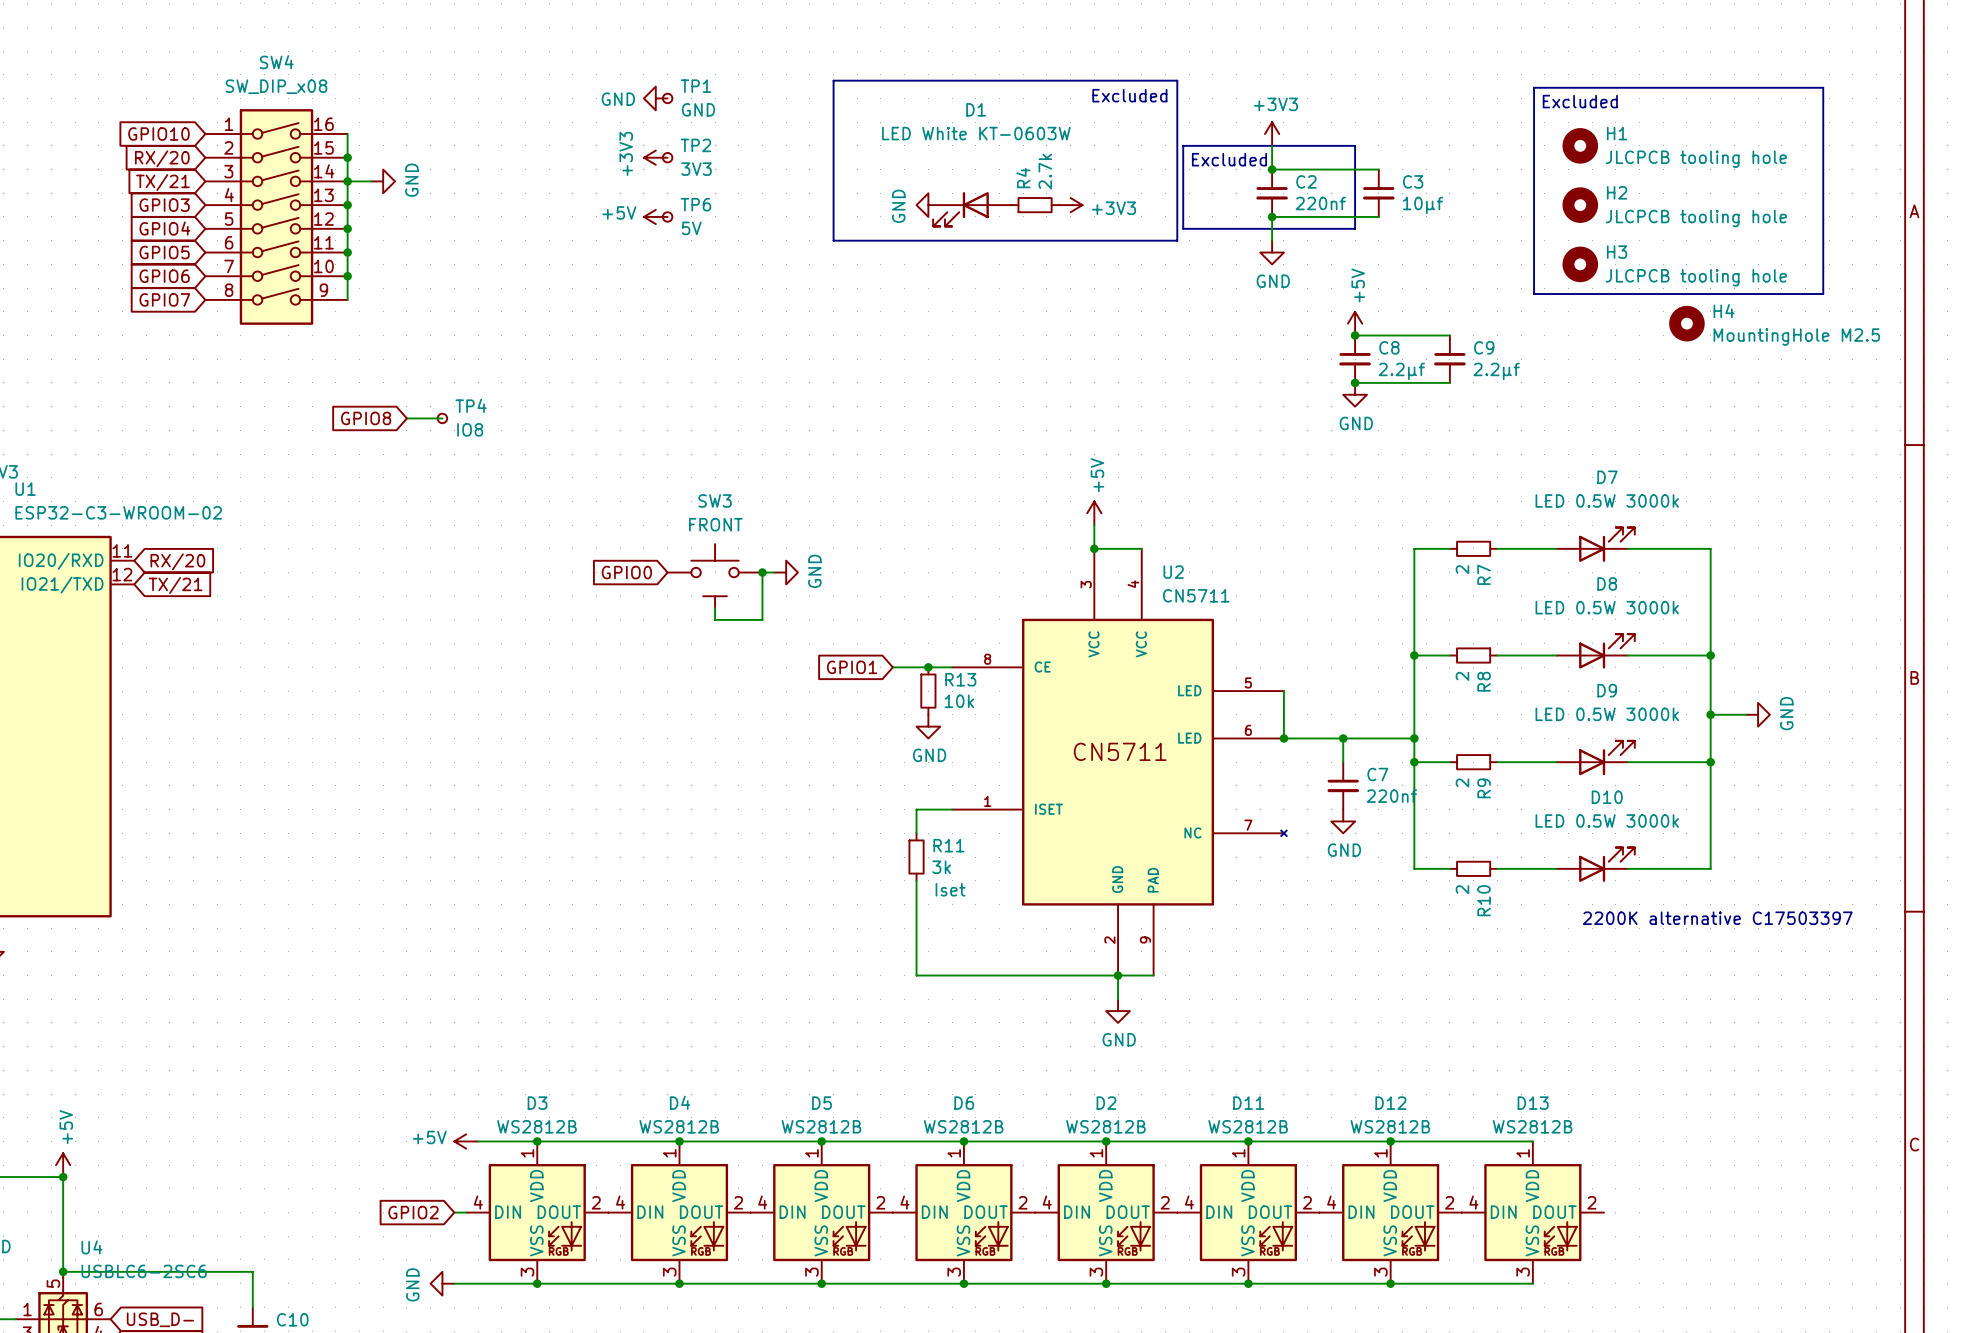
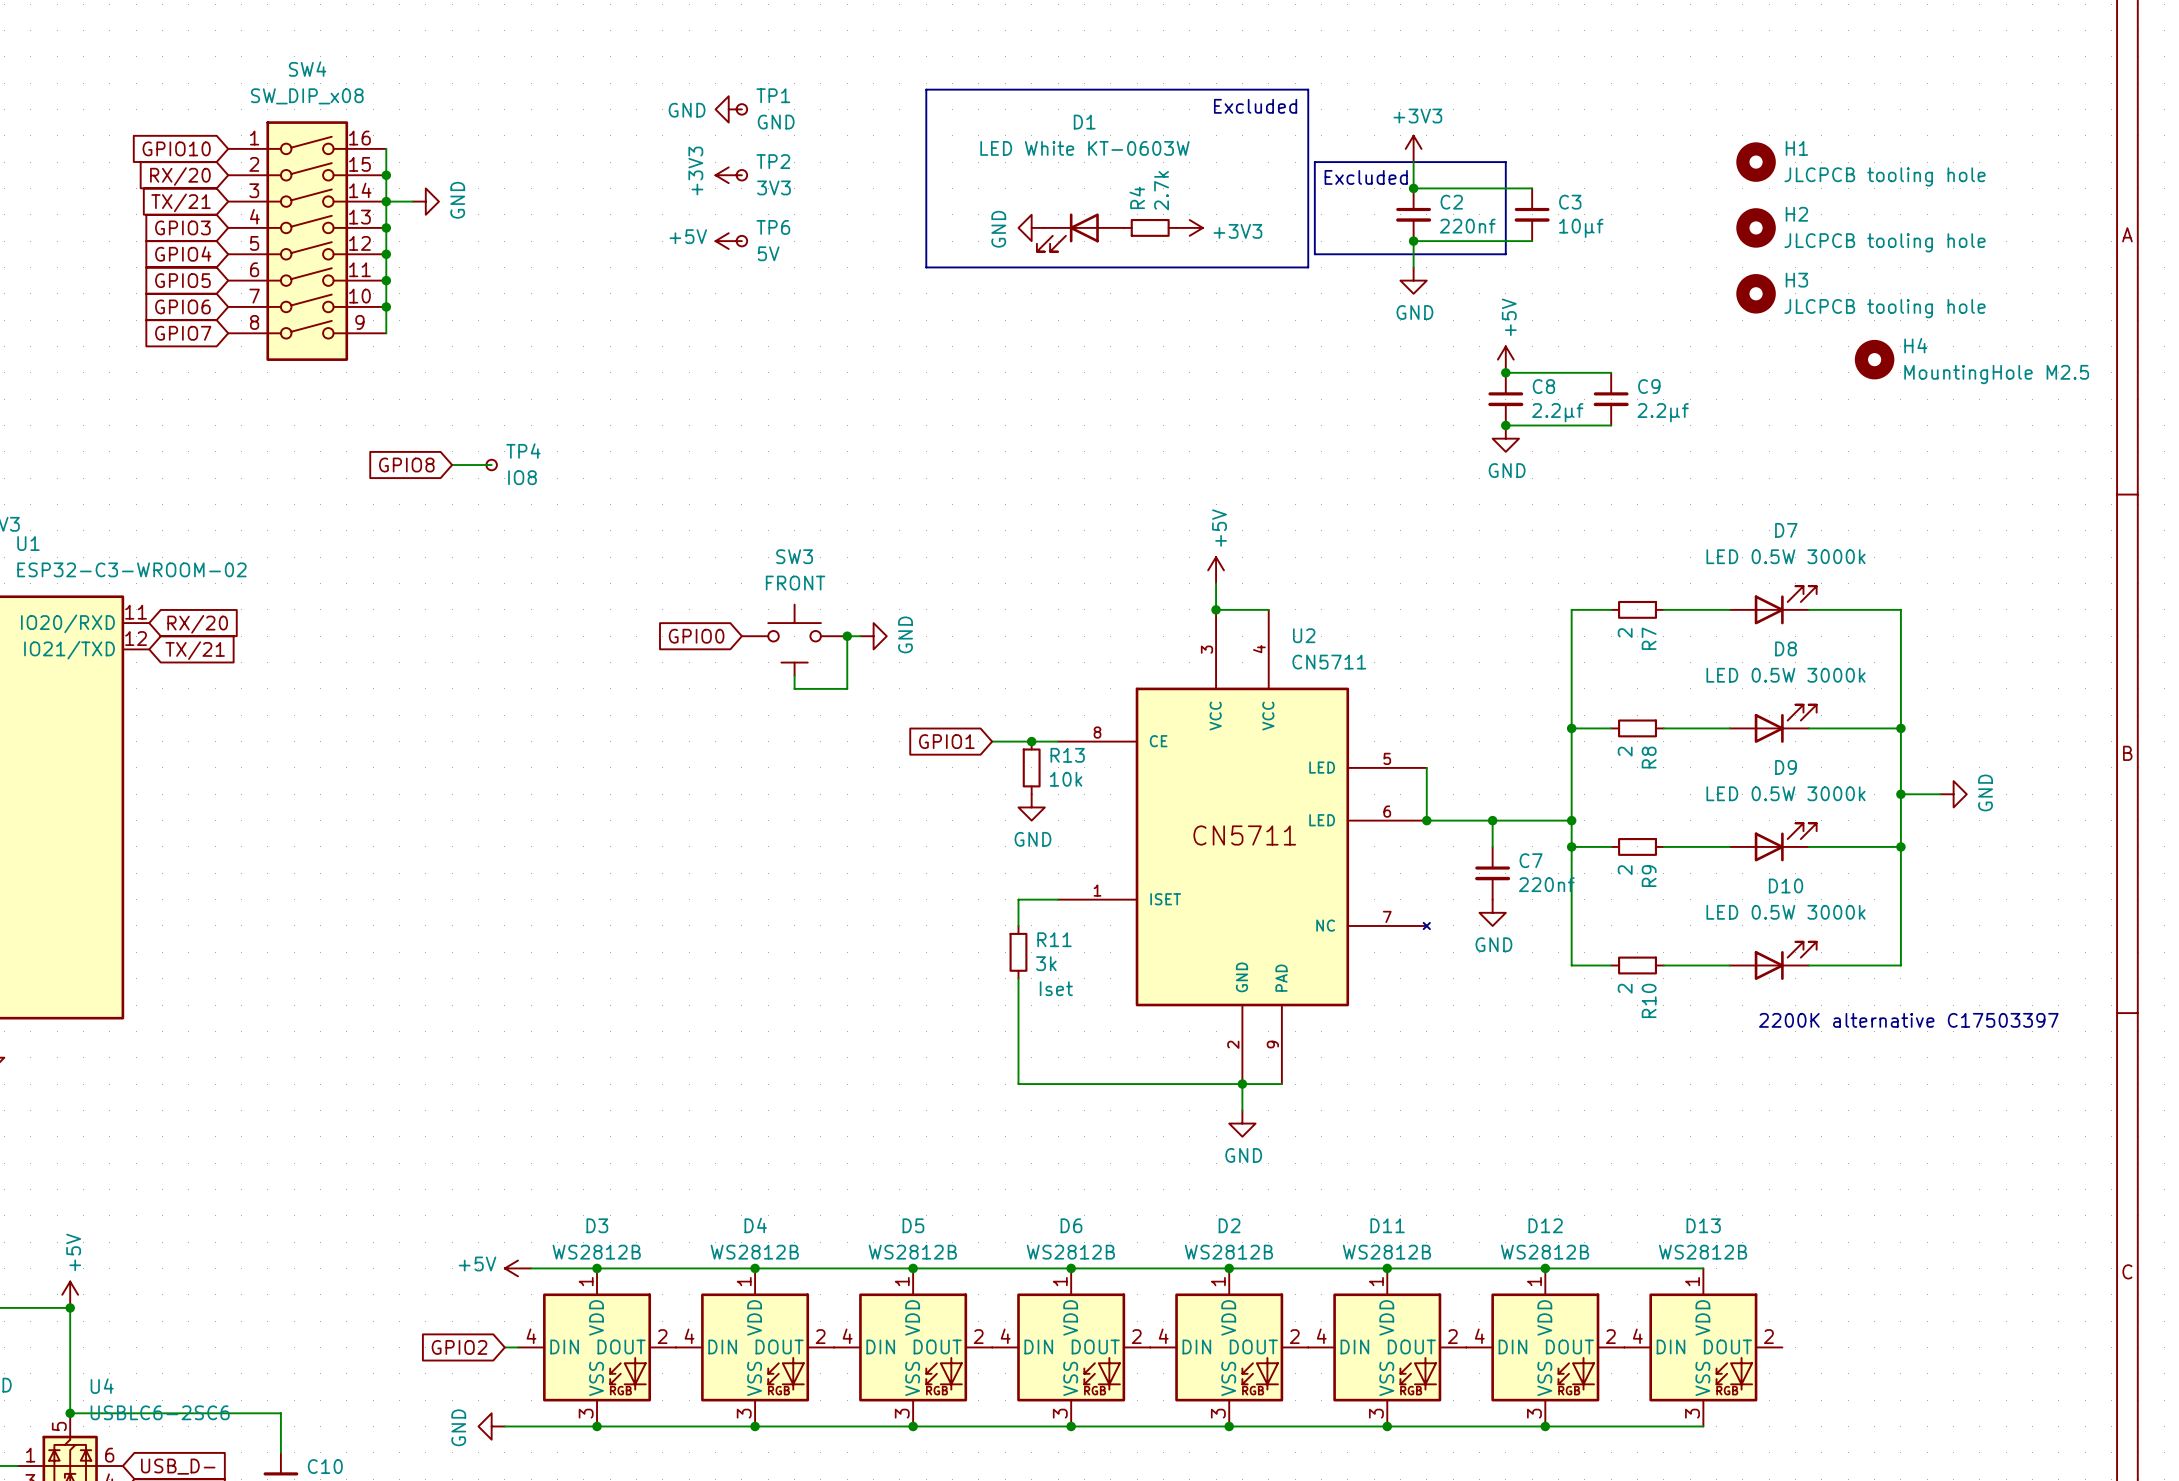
line: (1534, 87) (1823, 87) (1823, 294) (1534, 294) (1534, 87) -> none
text: Excluded (1580, 101) -> none

